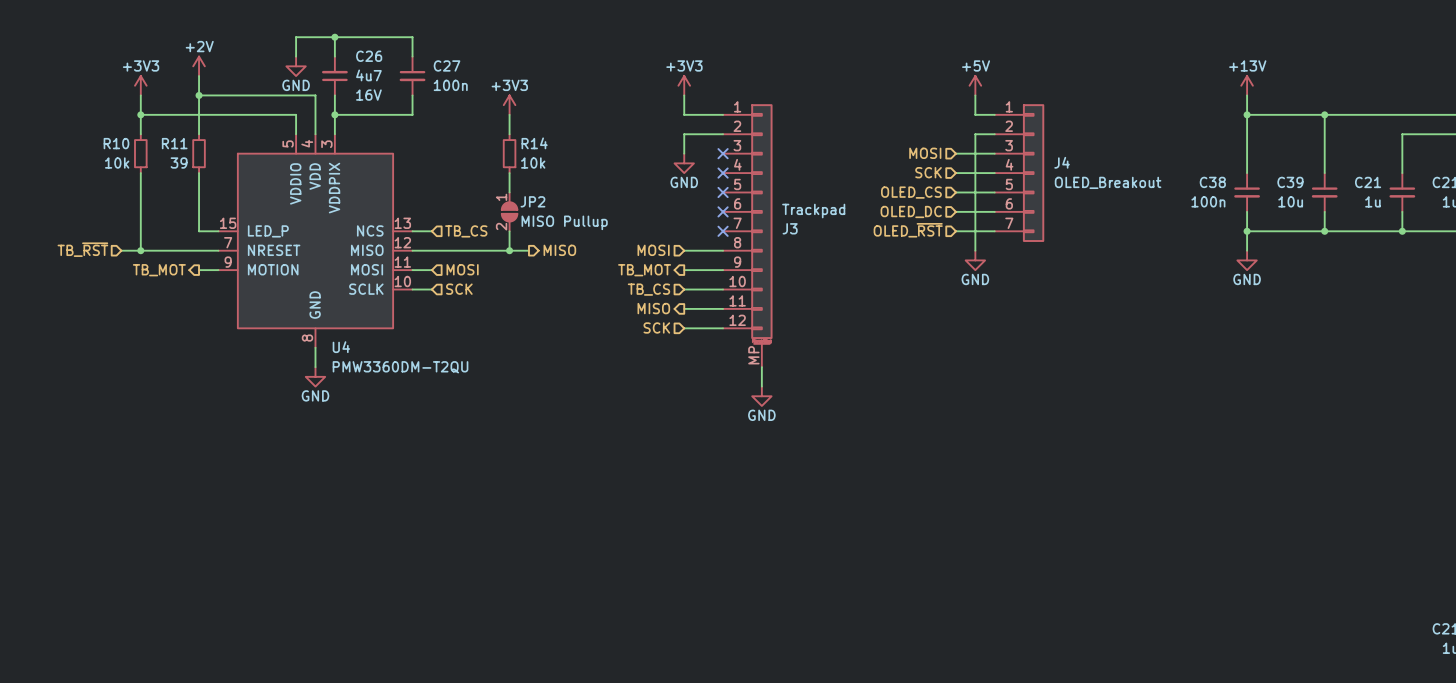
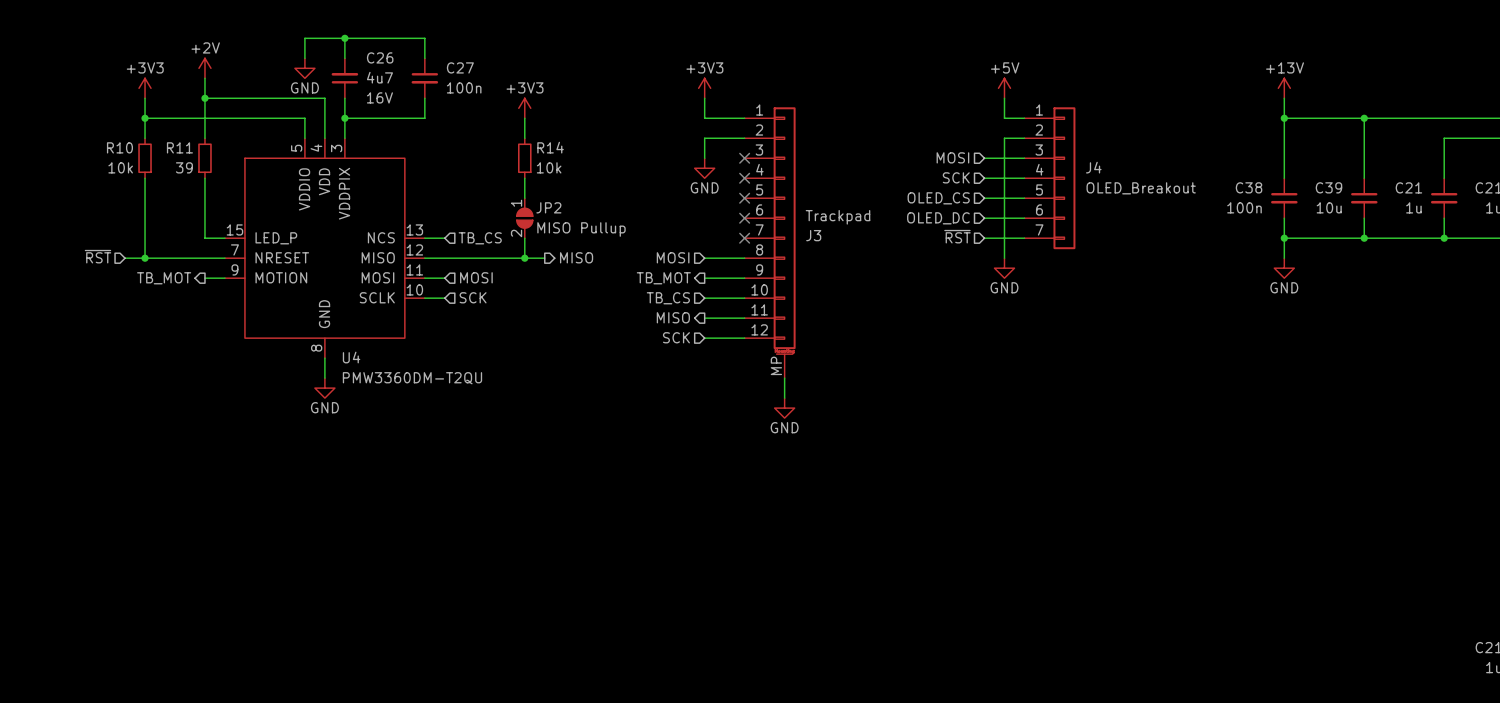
hierarchical label: OLED_~{RST} (908, 230) -> ~{RST} (957, 236)
hierarchical label: TB_~{RST} (82, 249) -> ~{RST} (98, 256)

